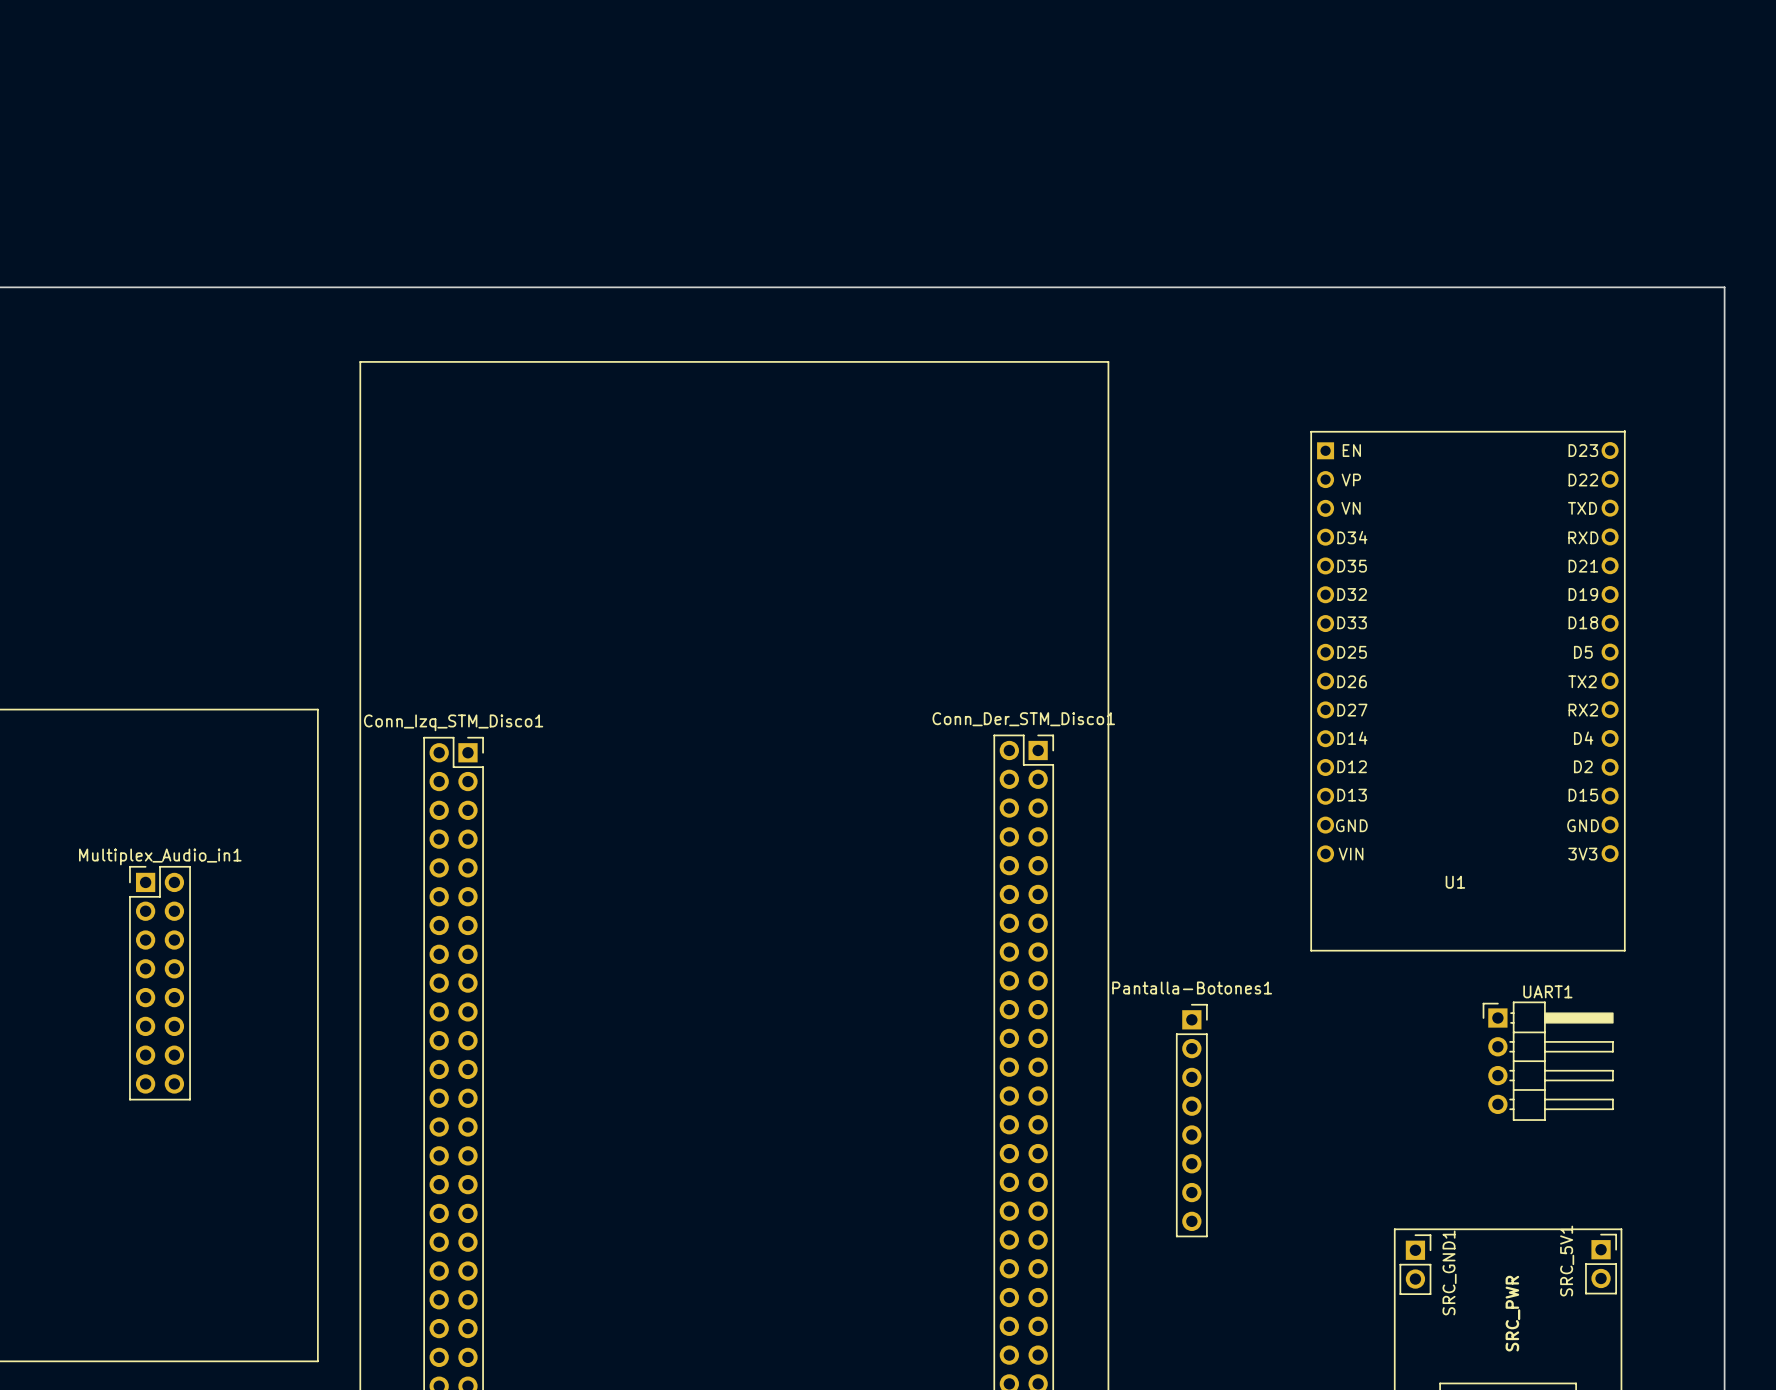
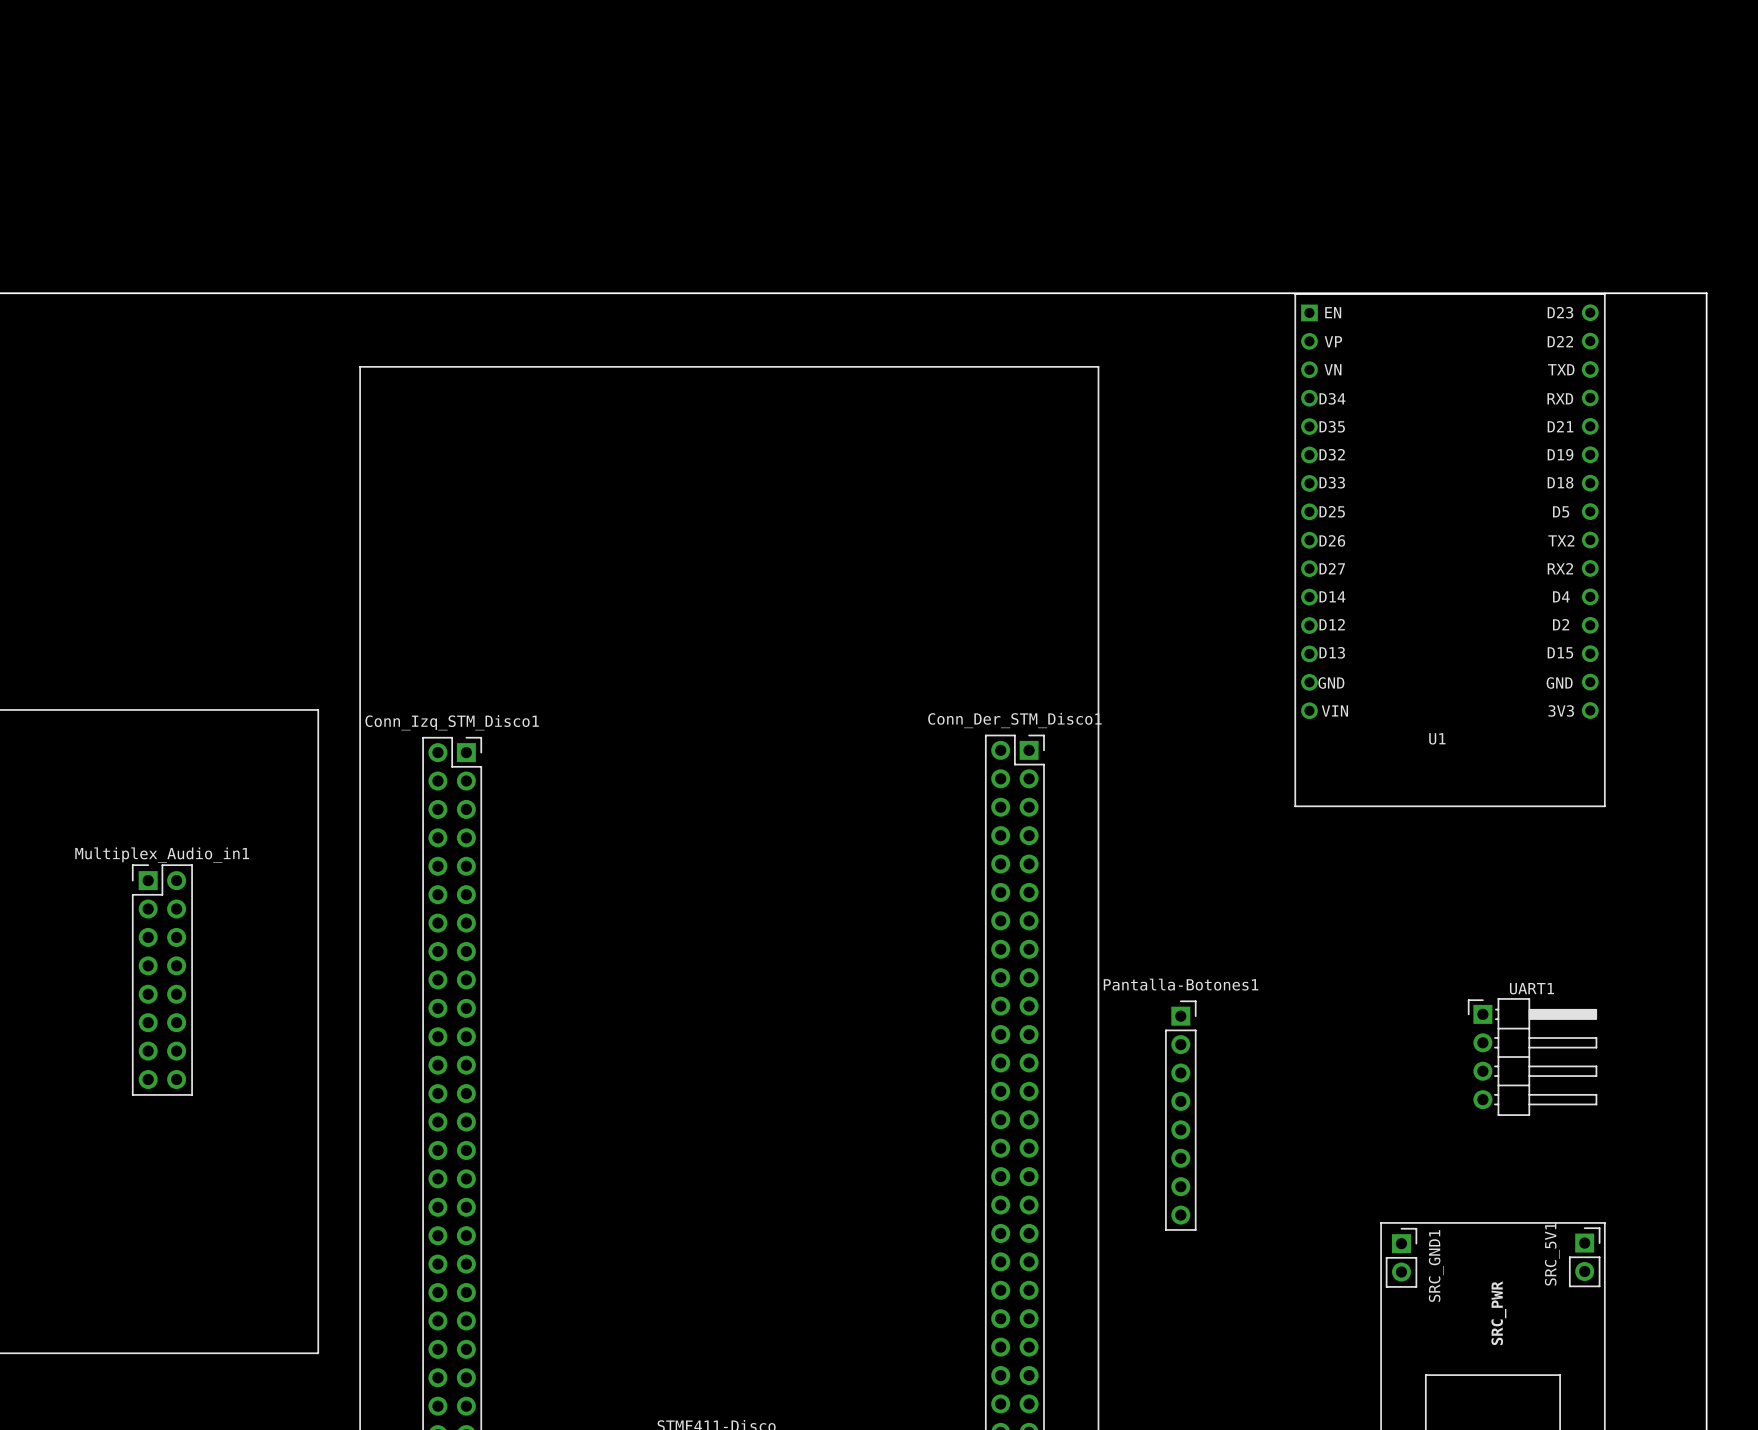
U1 position: (1468, 690) -> (1450, 549)

